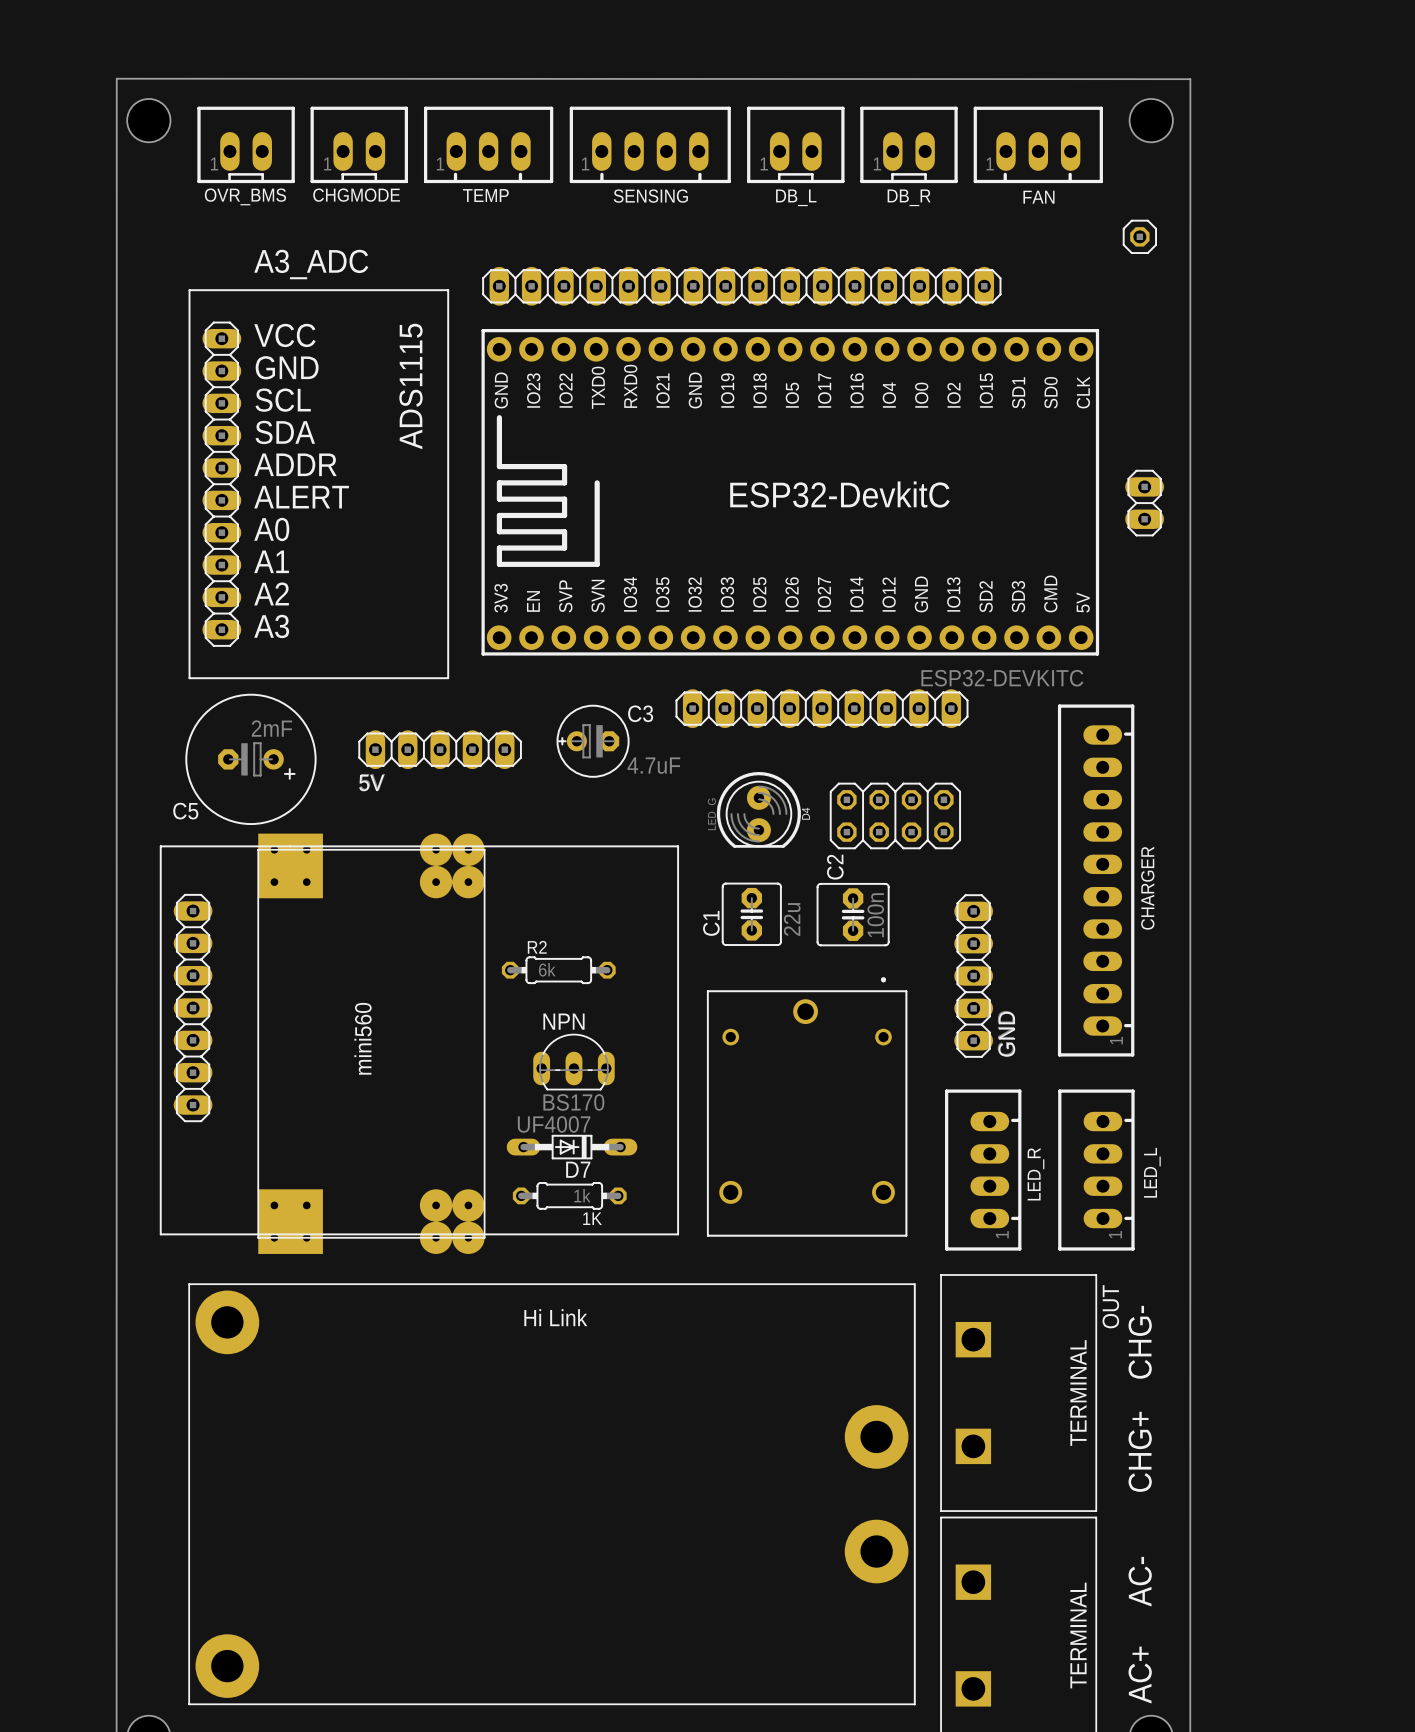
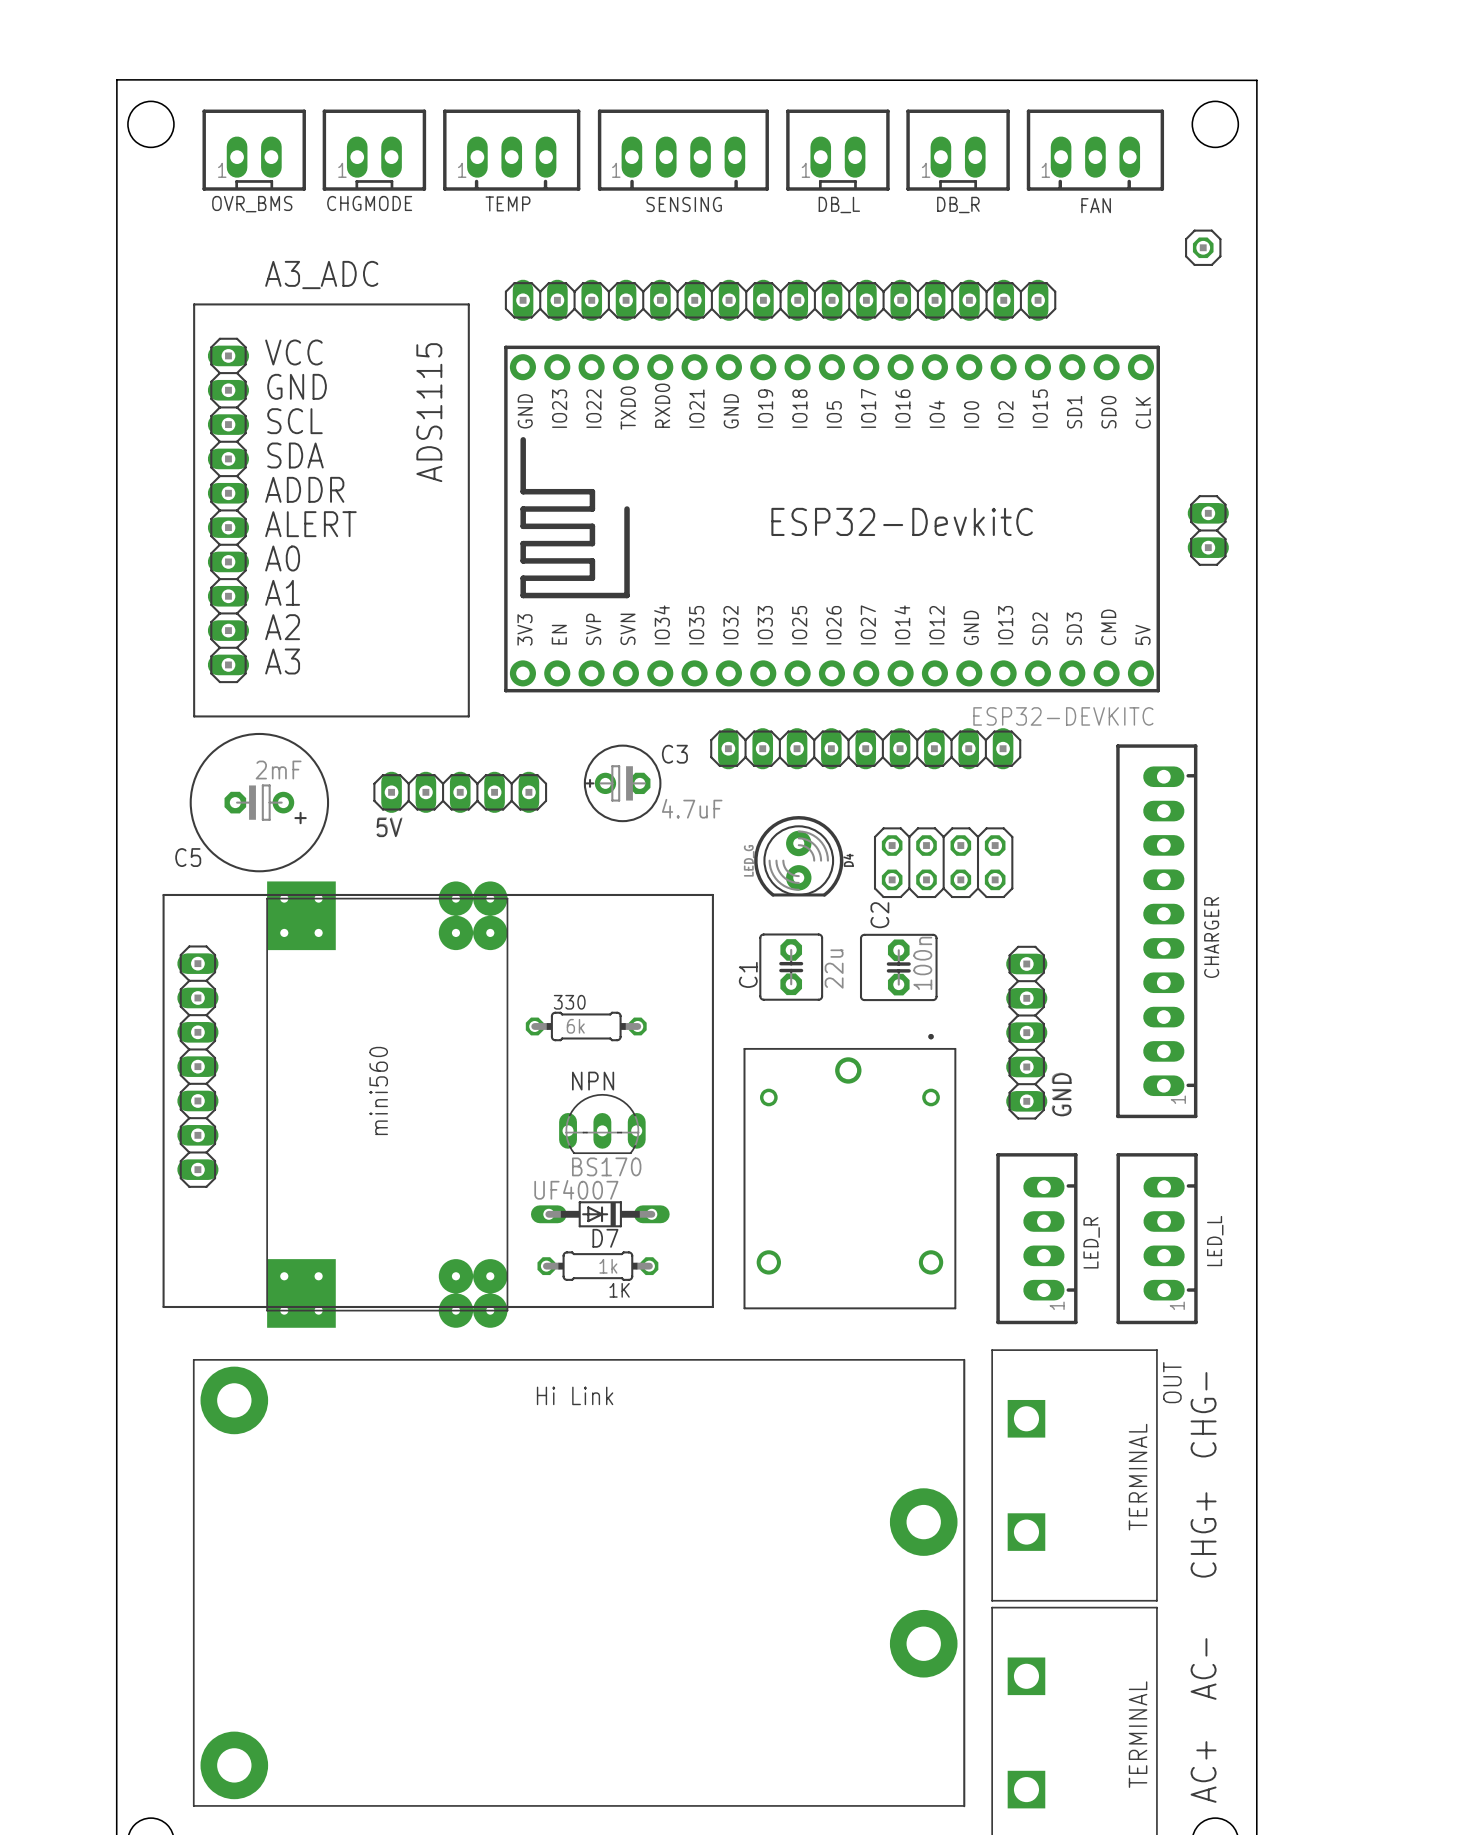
R2 name: R2 (537, 947) -> 330 (569, 1002)

